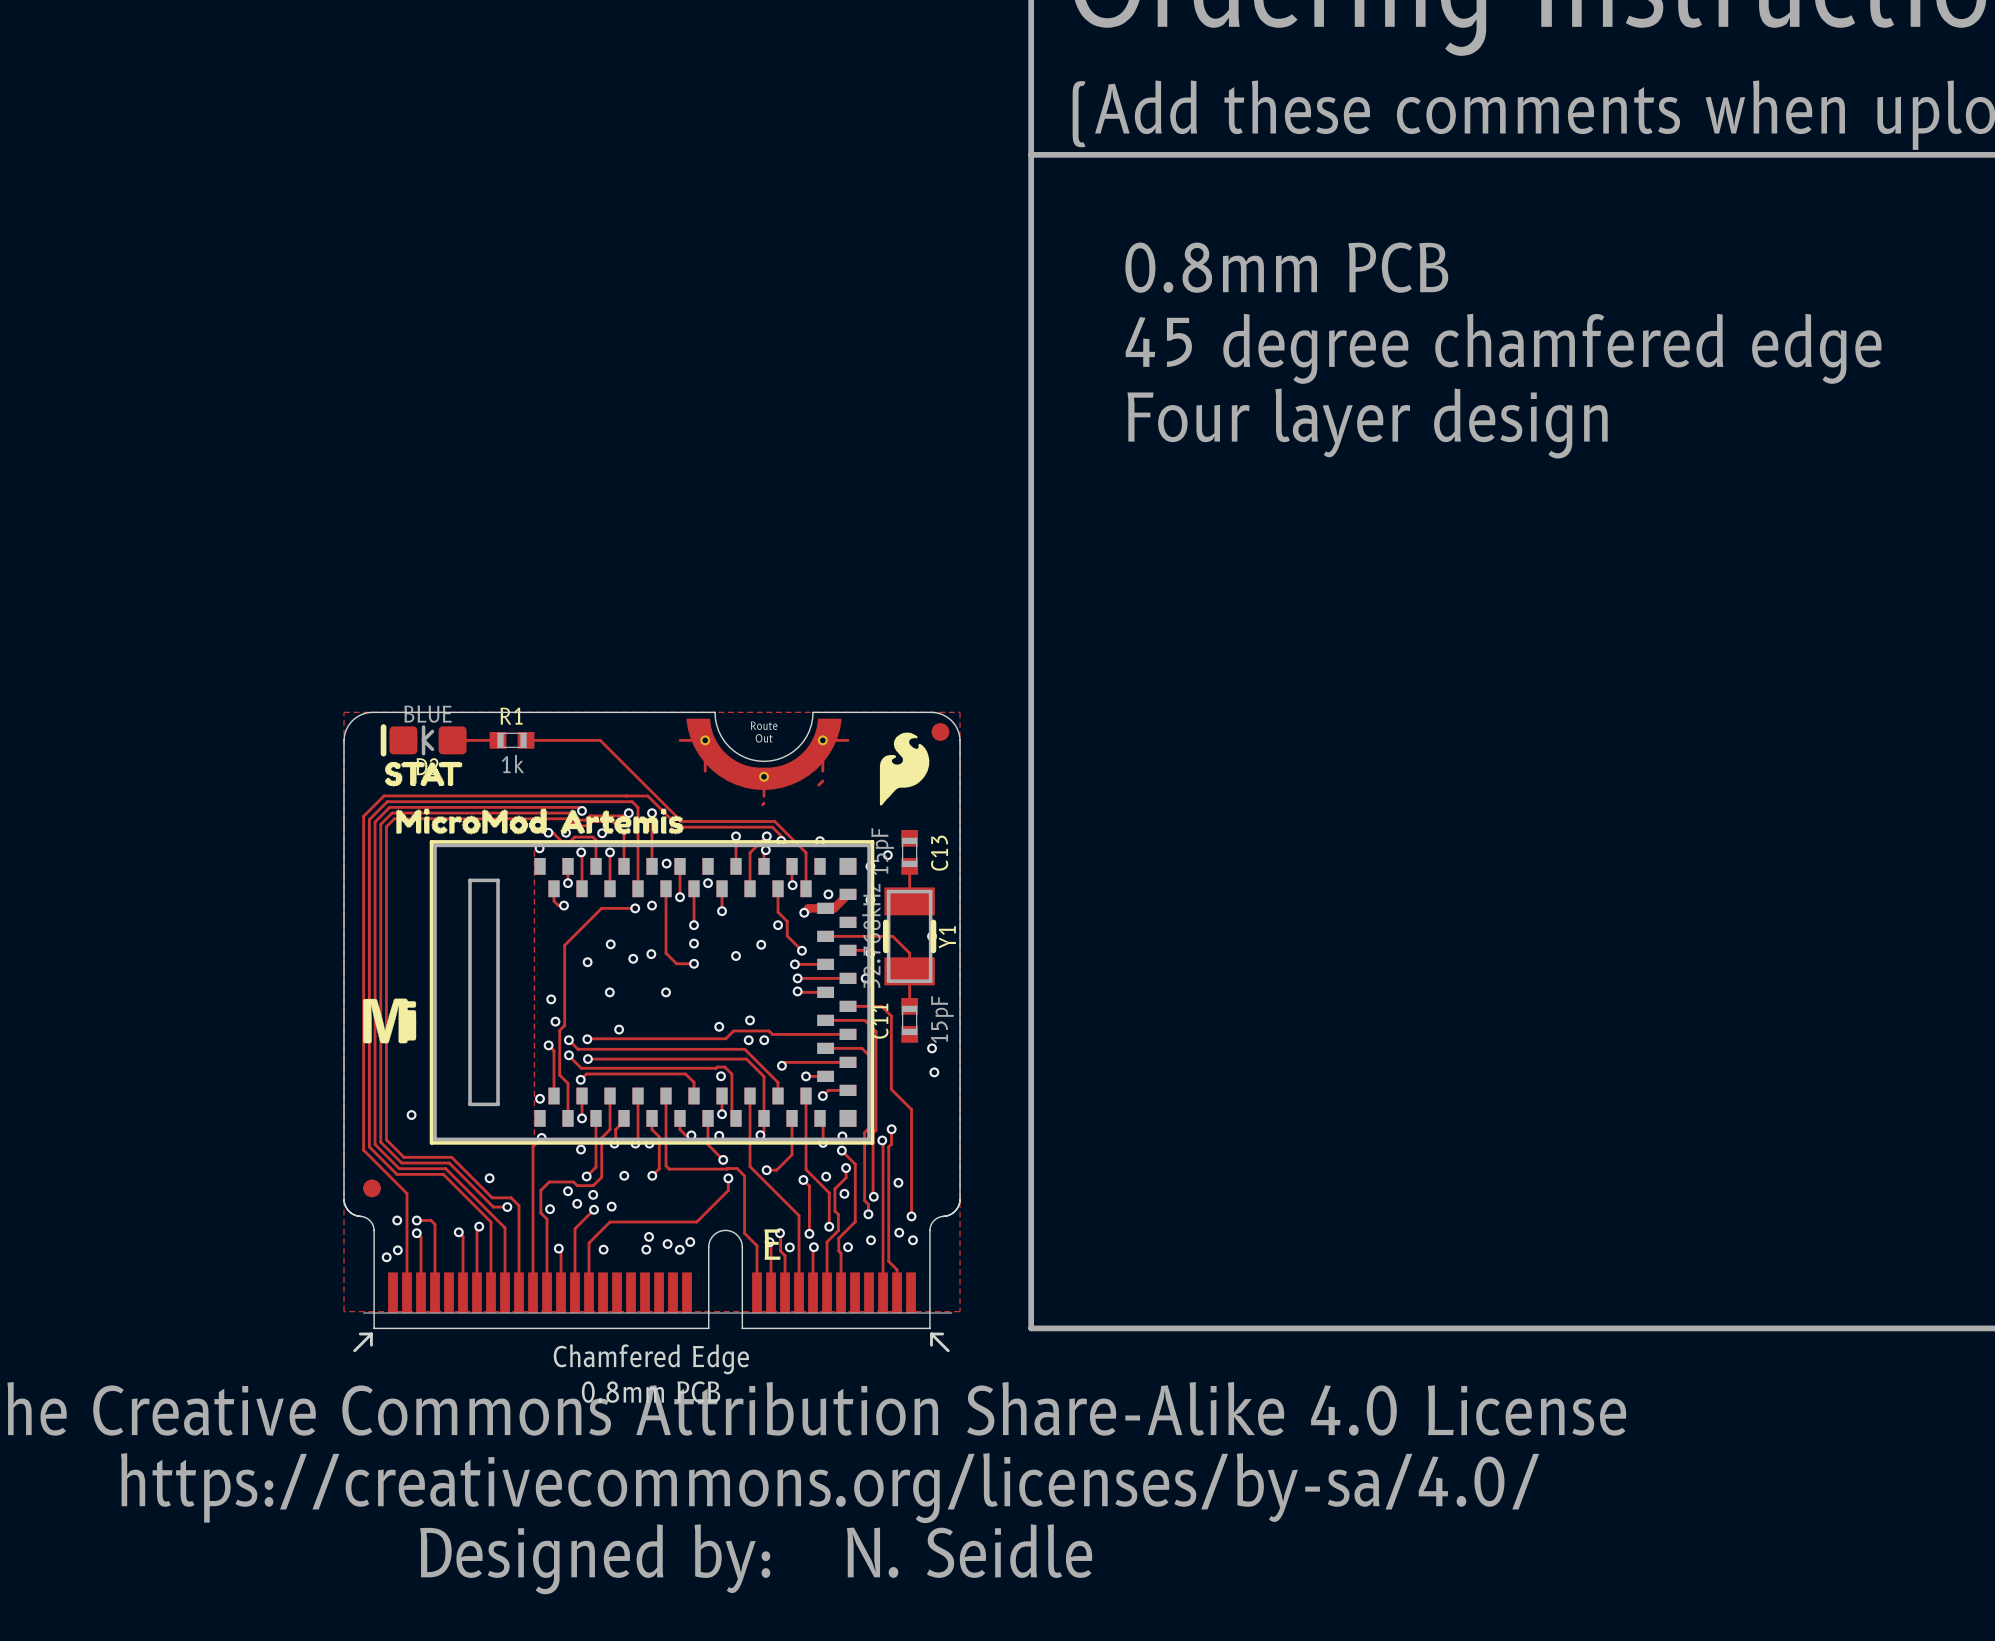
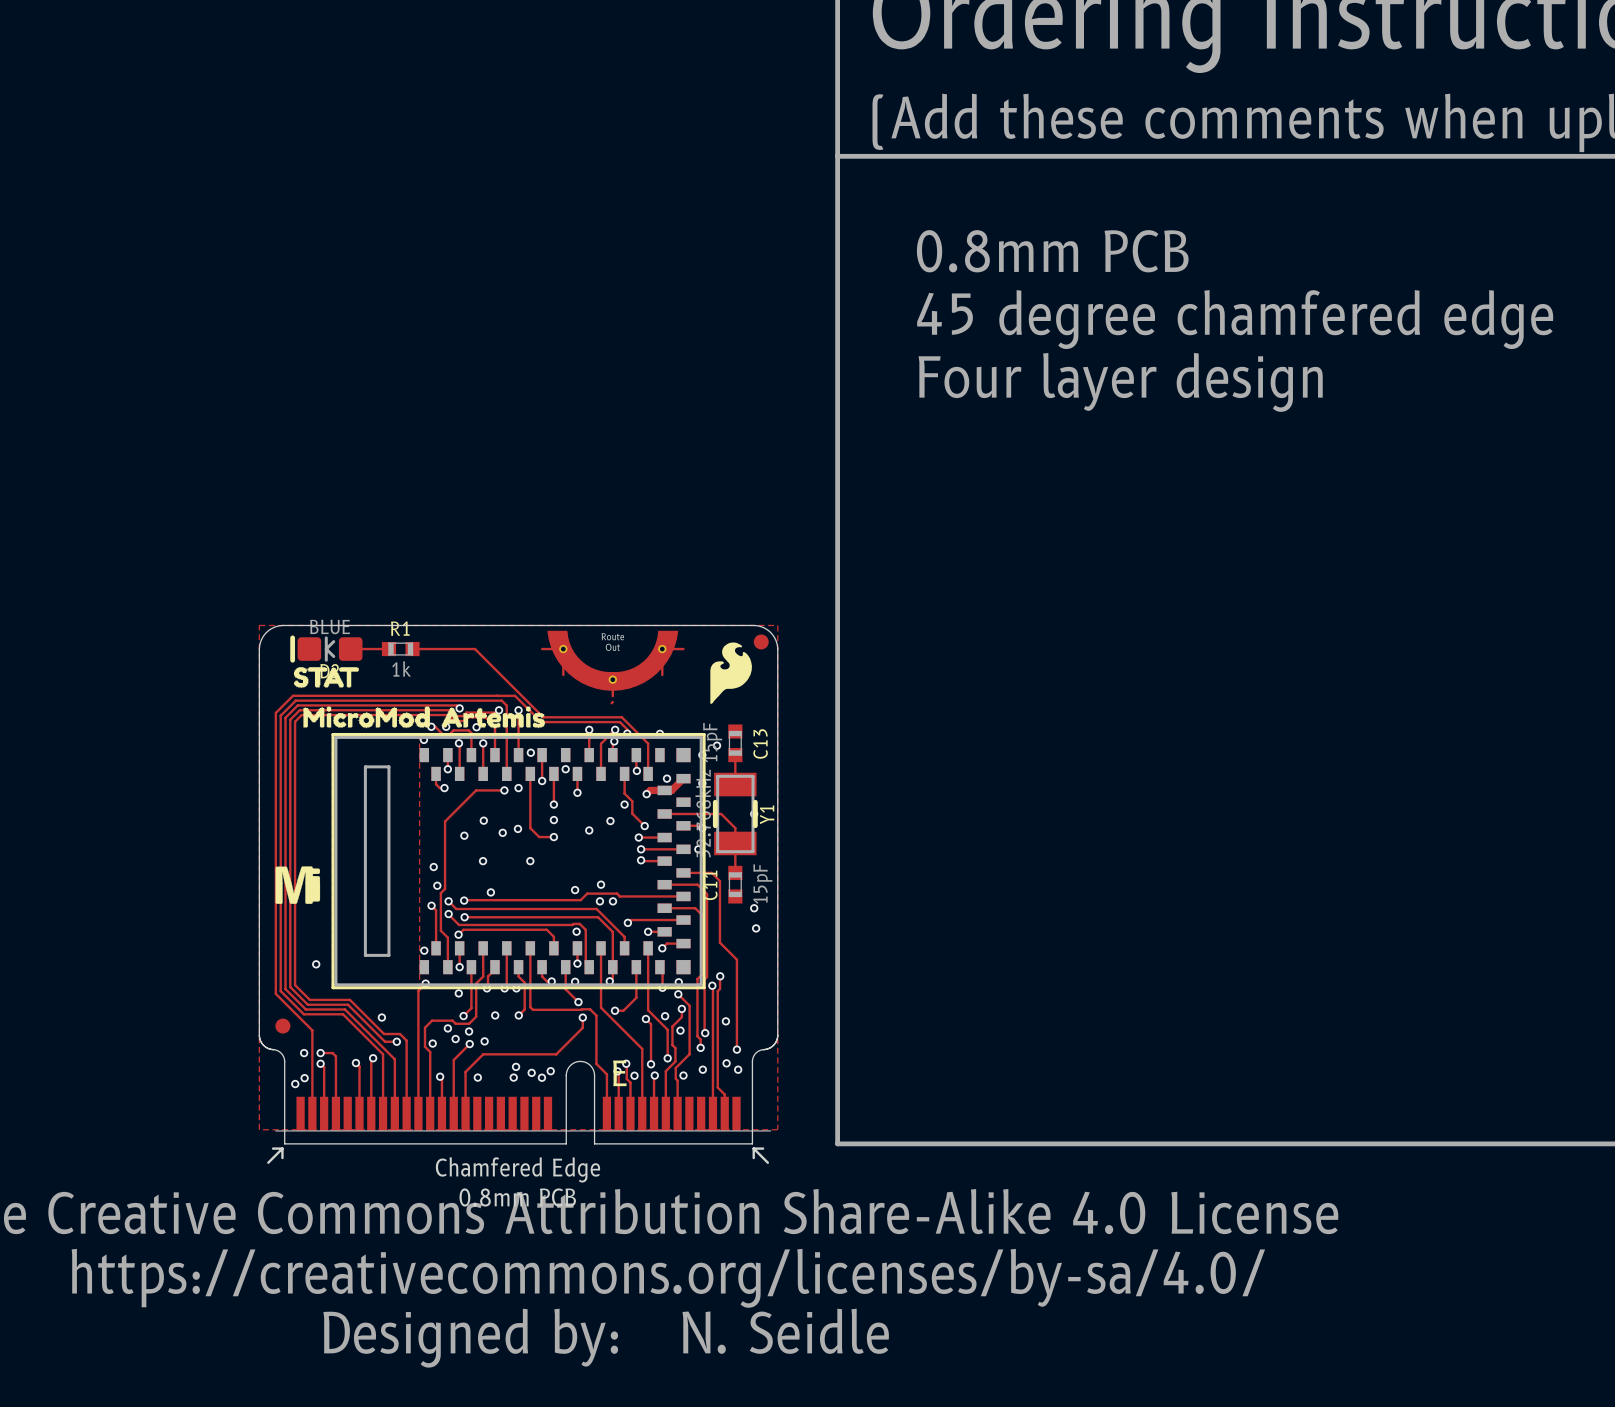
board edge: (715, 712) (718, 731) (729, 747) (745, 757) (764, 761) (782, 757) (798, 747) (809, 731) (813, 712) -> (571, 625) (654, 625)
track: (822, 780) (818, 785) -> none

